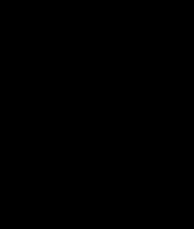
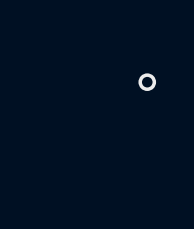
via: none -> (147, 82)

